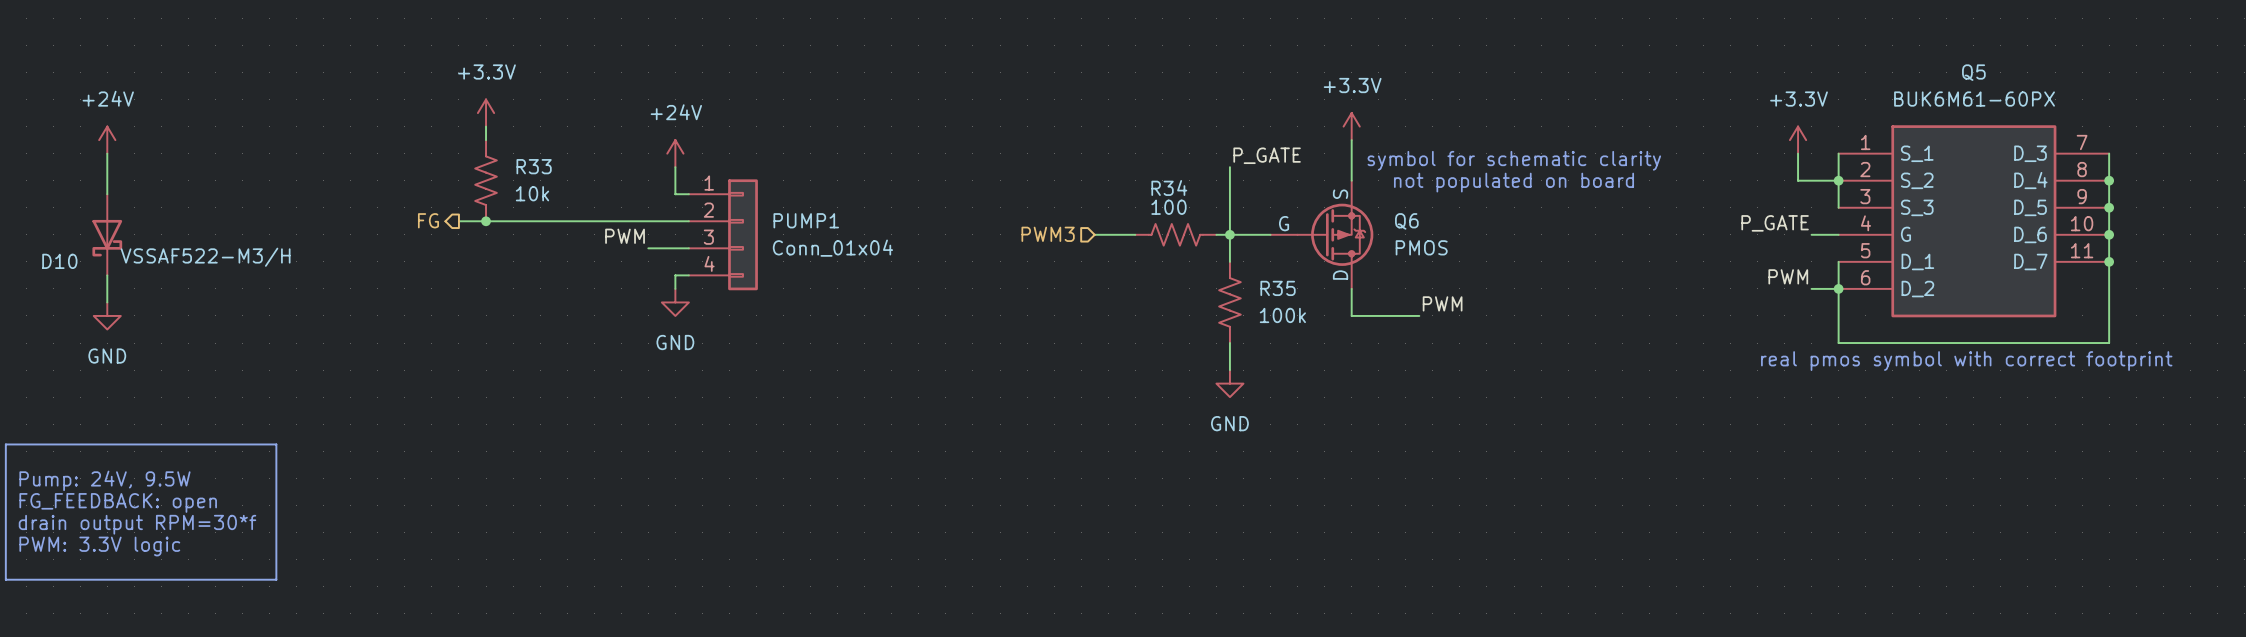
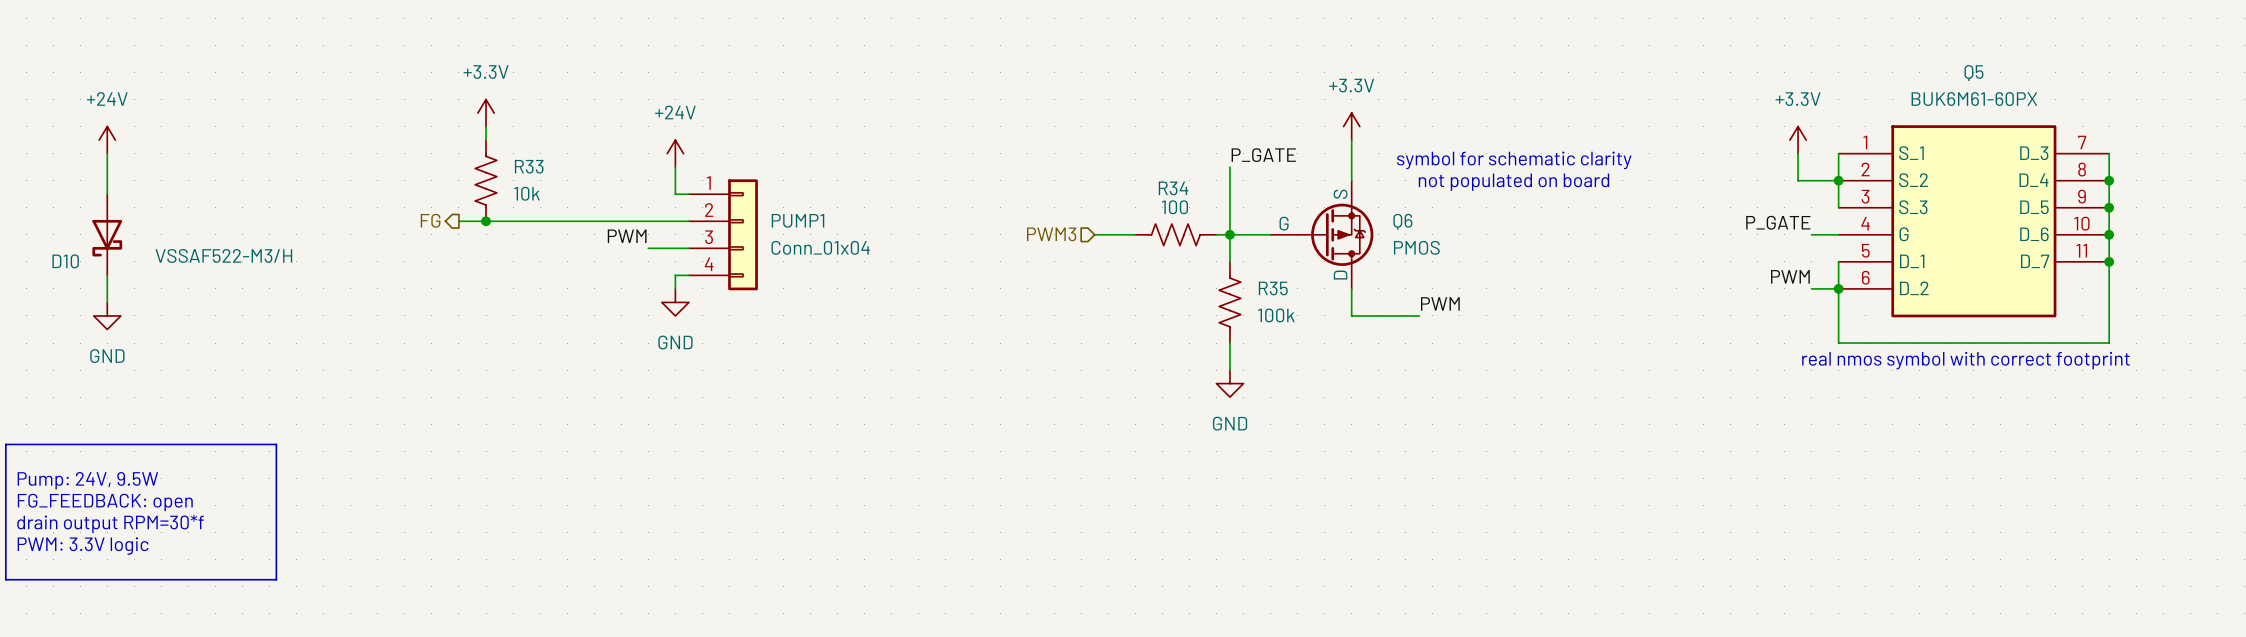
text: real pmos symbol with correct footprint (1966, 361) -> real nmos symbol with correct footprint (1965, 360)

